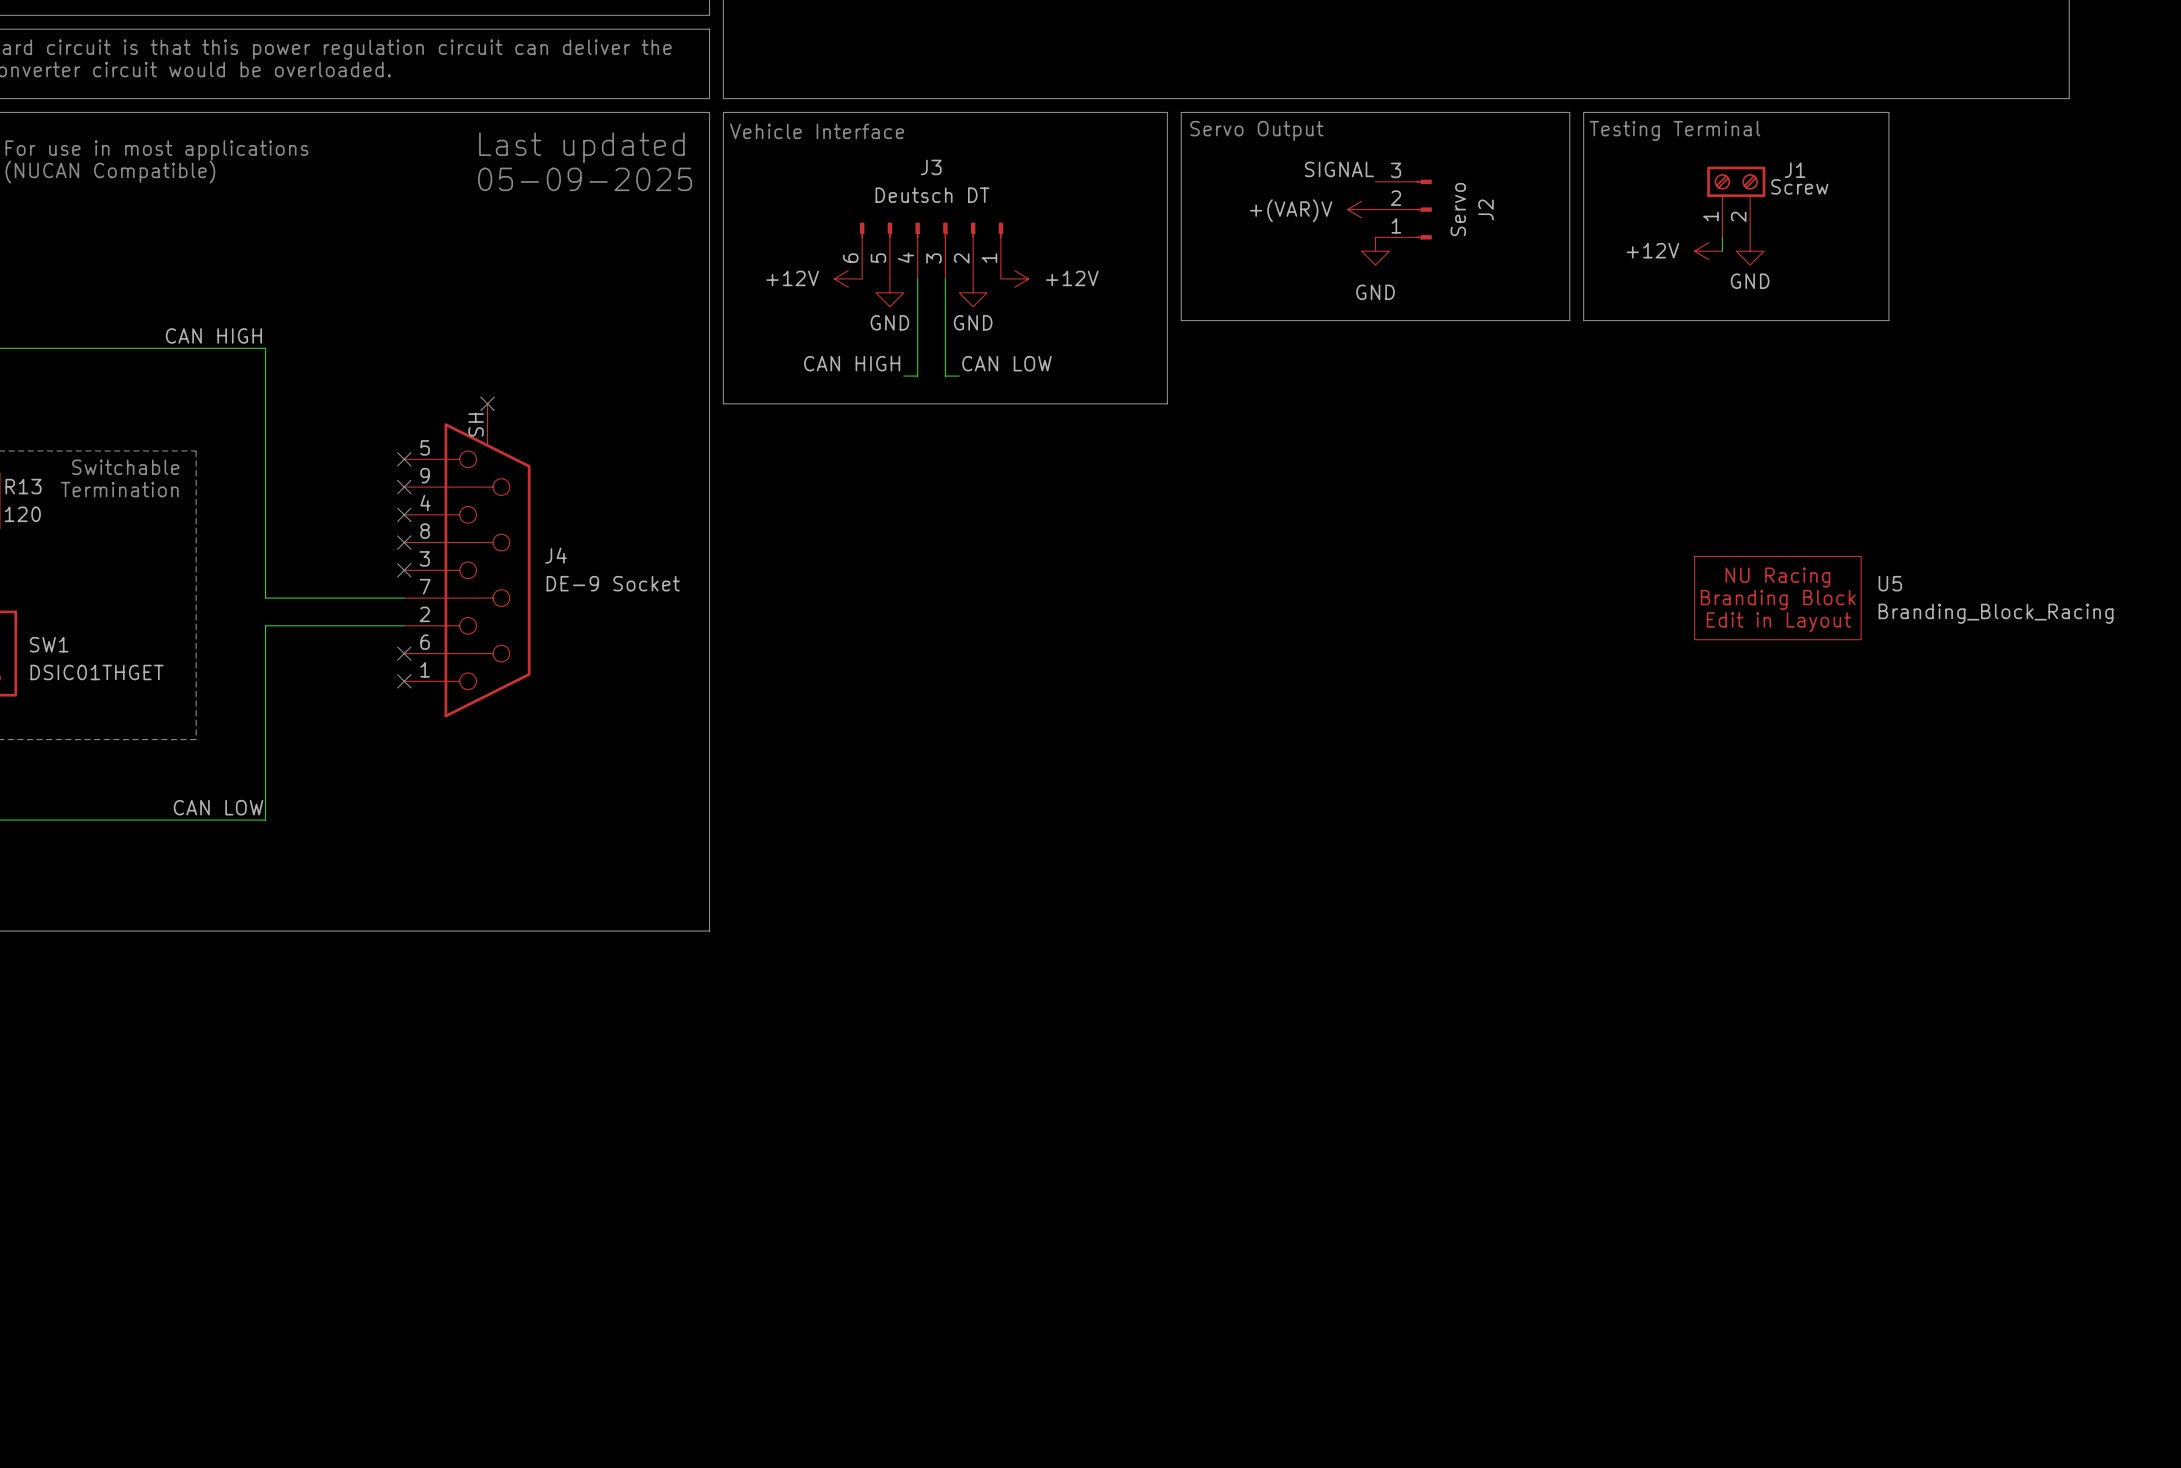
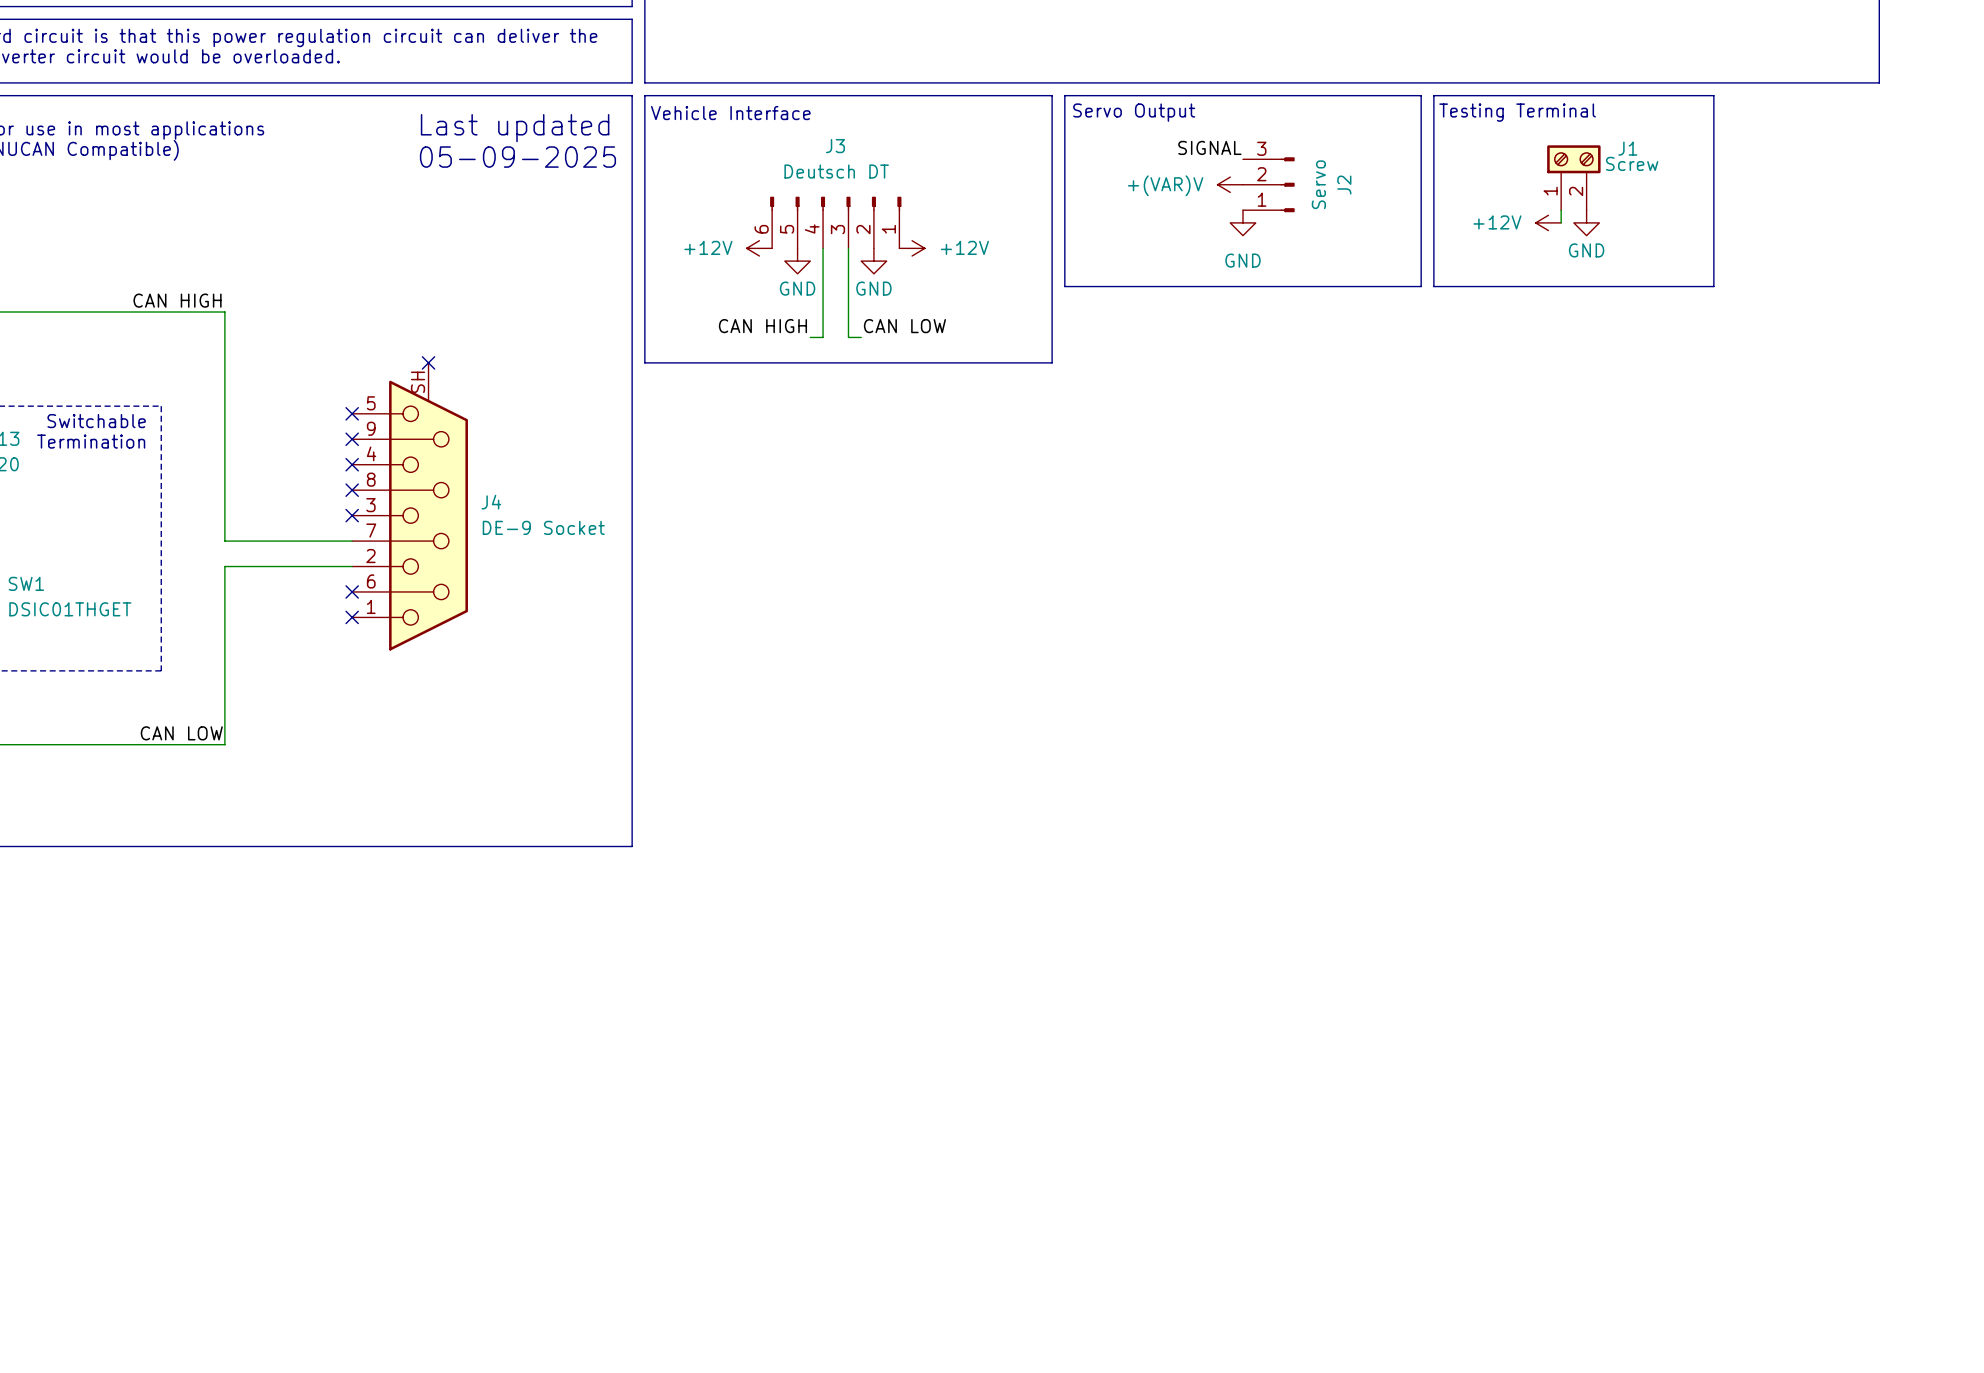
U5: Branding_Block_Racing (1777, 598) -> none

